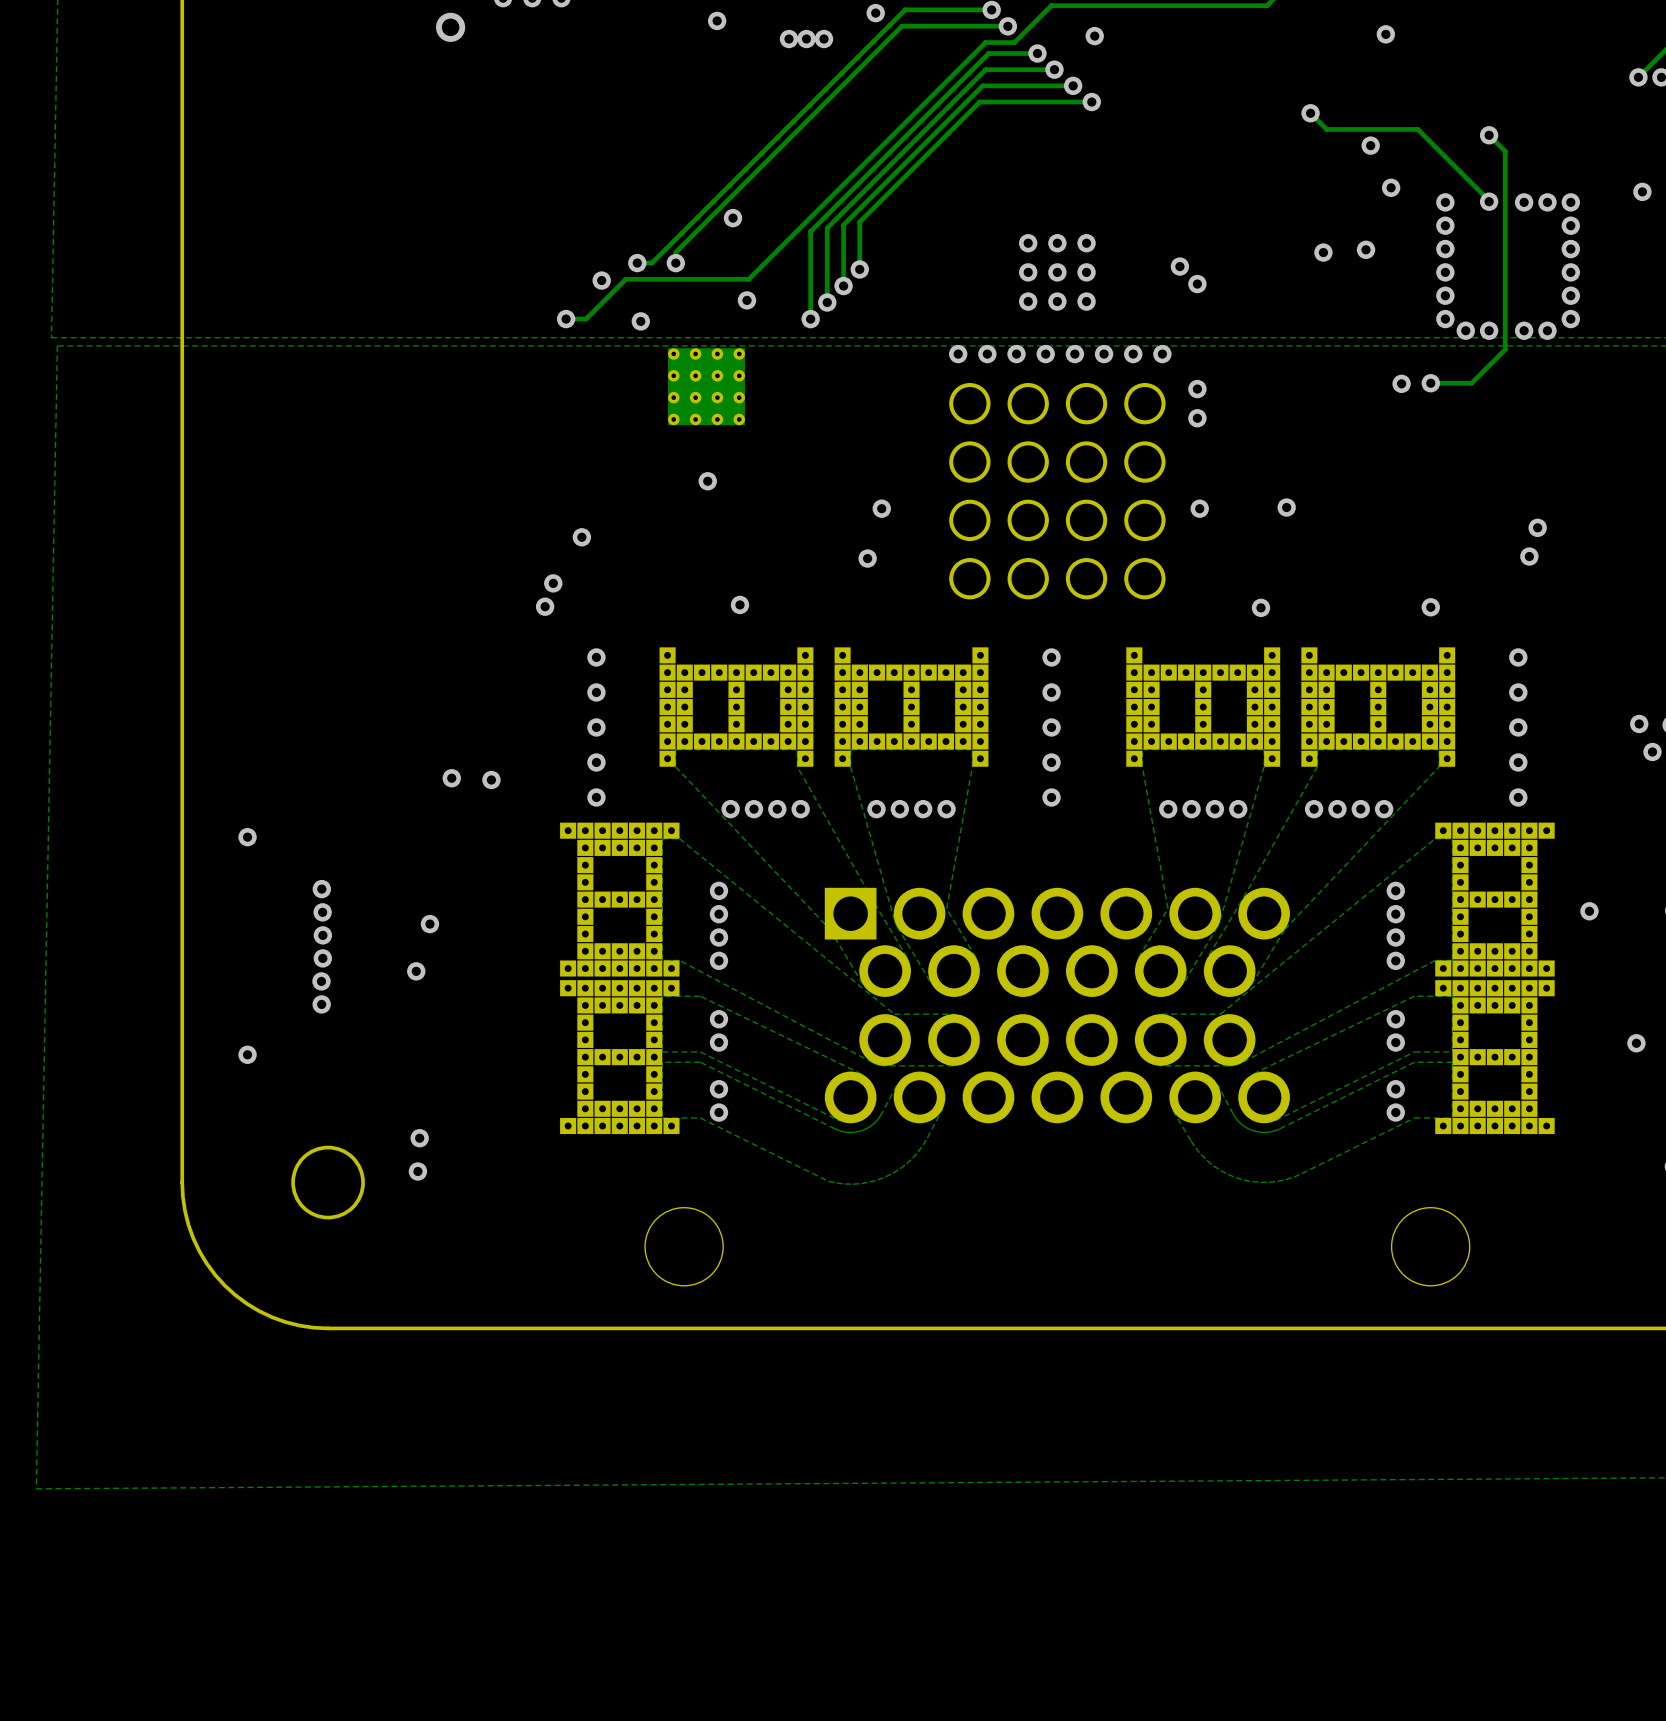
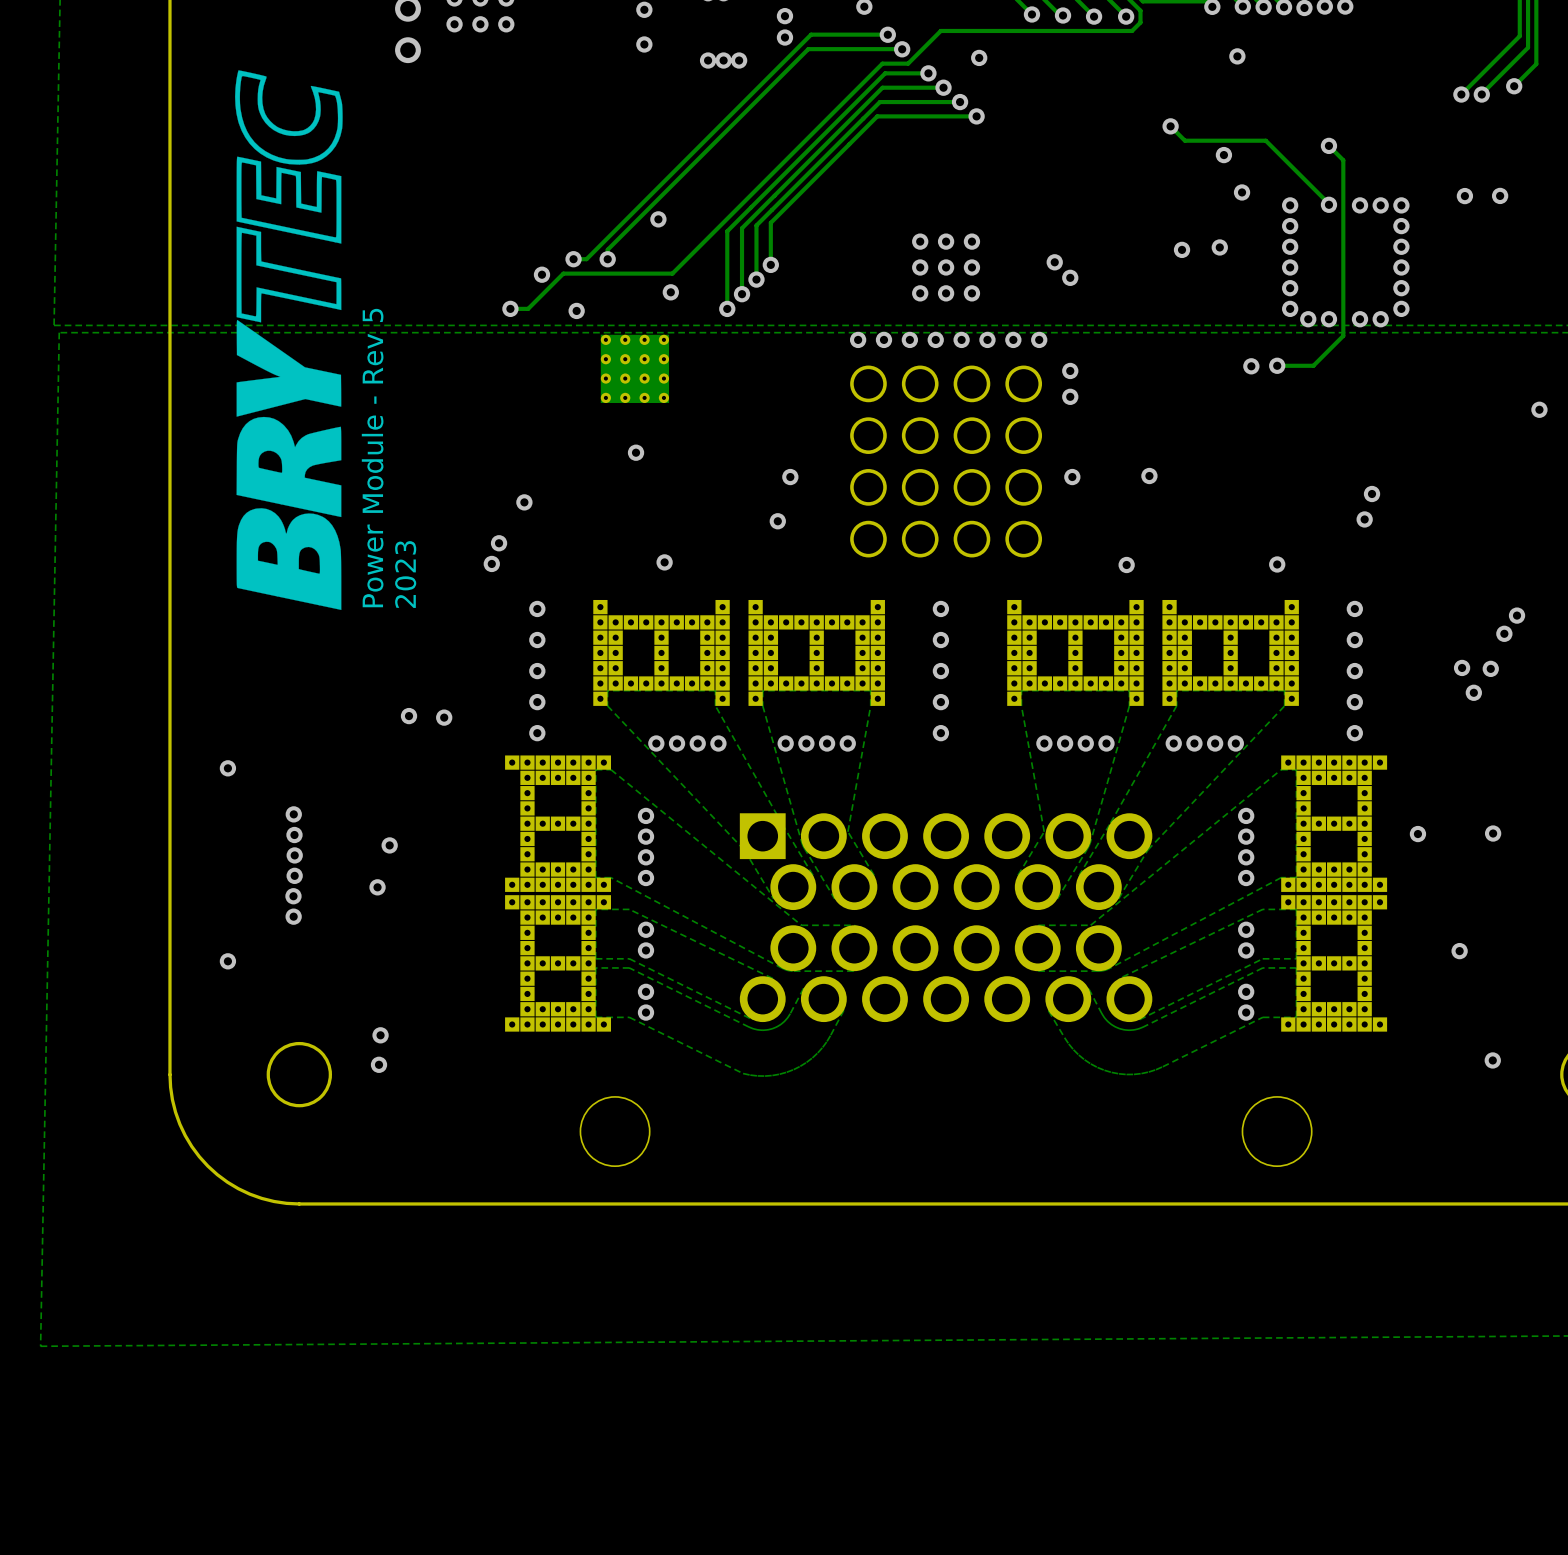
drawing: none -> [235, 70, 343, 610]
text: none -> Power Module - Rev 5 (372, 458)
text: none -> 2023 (405, 574)

